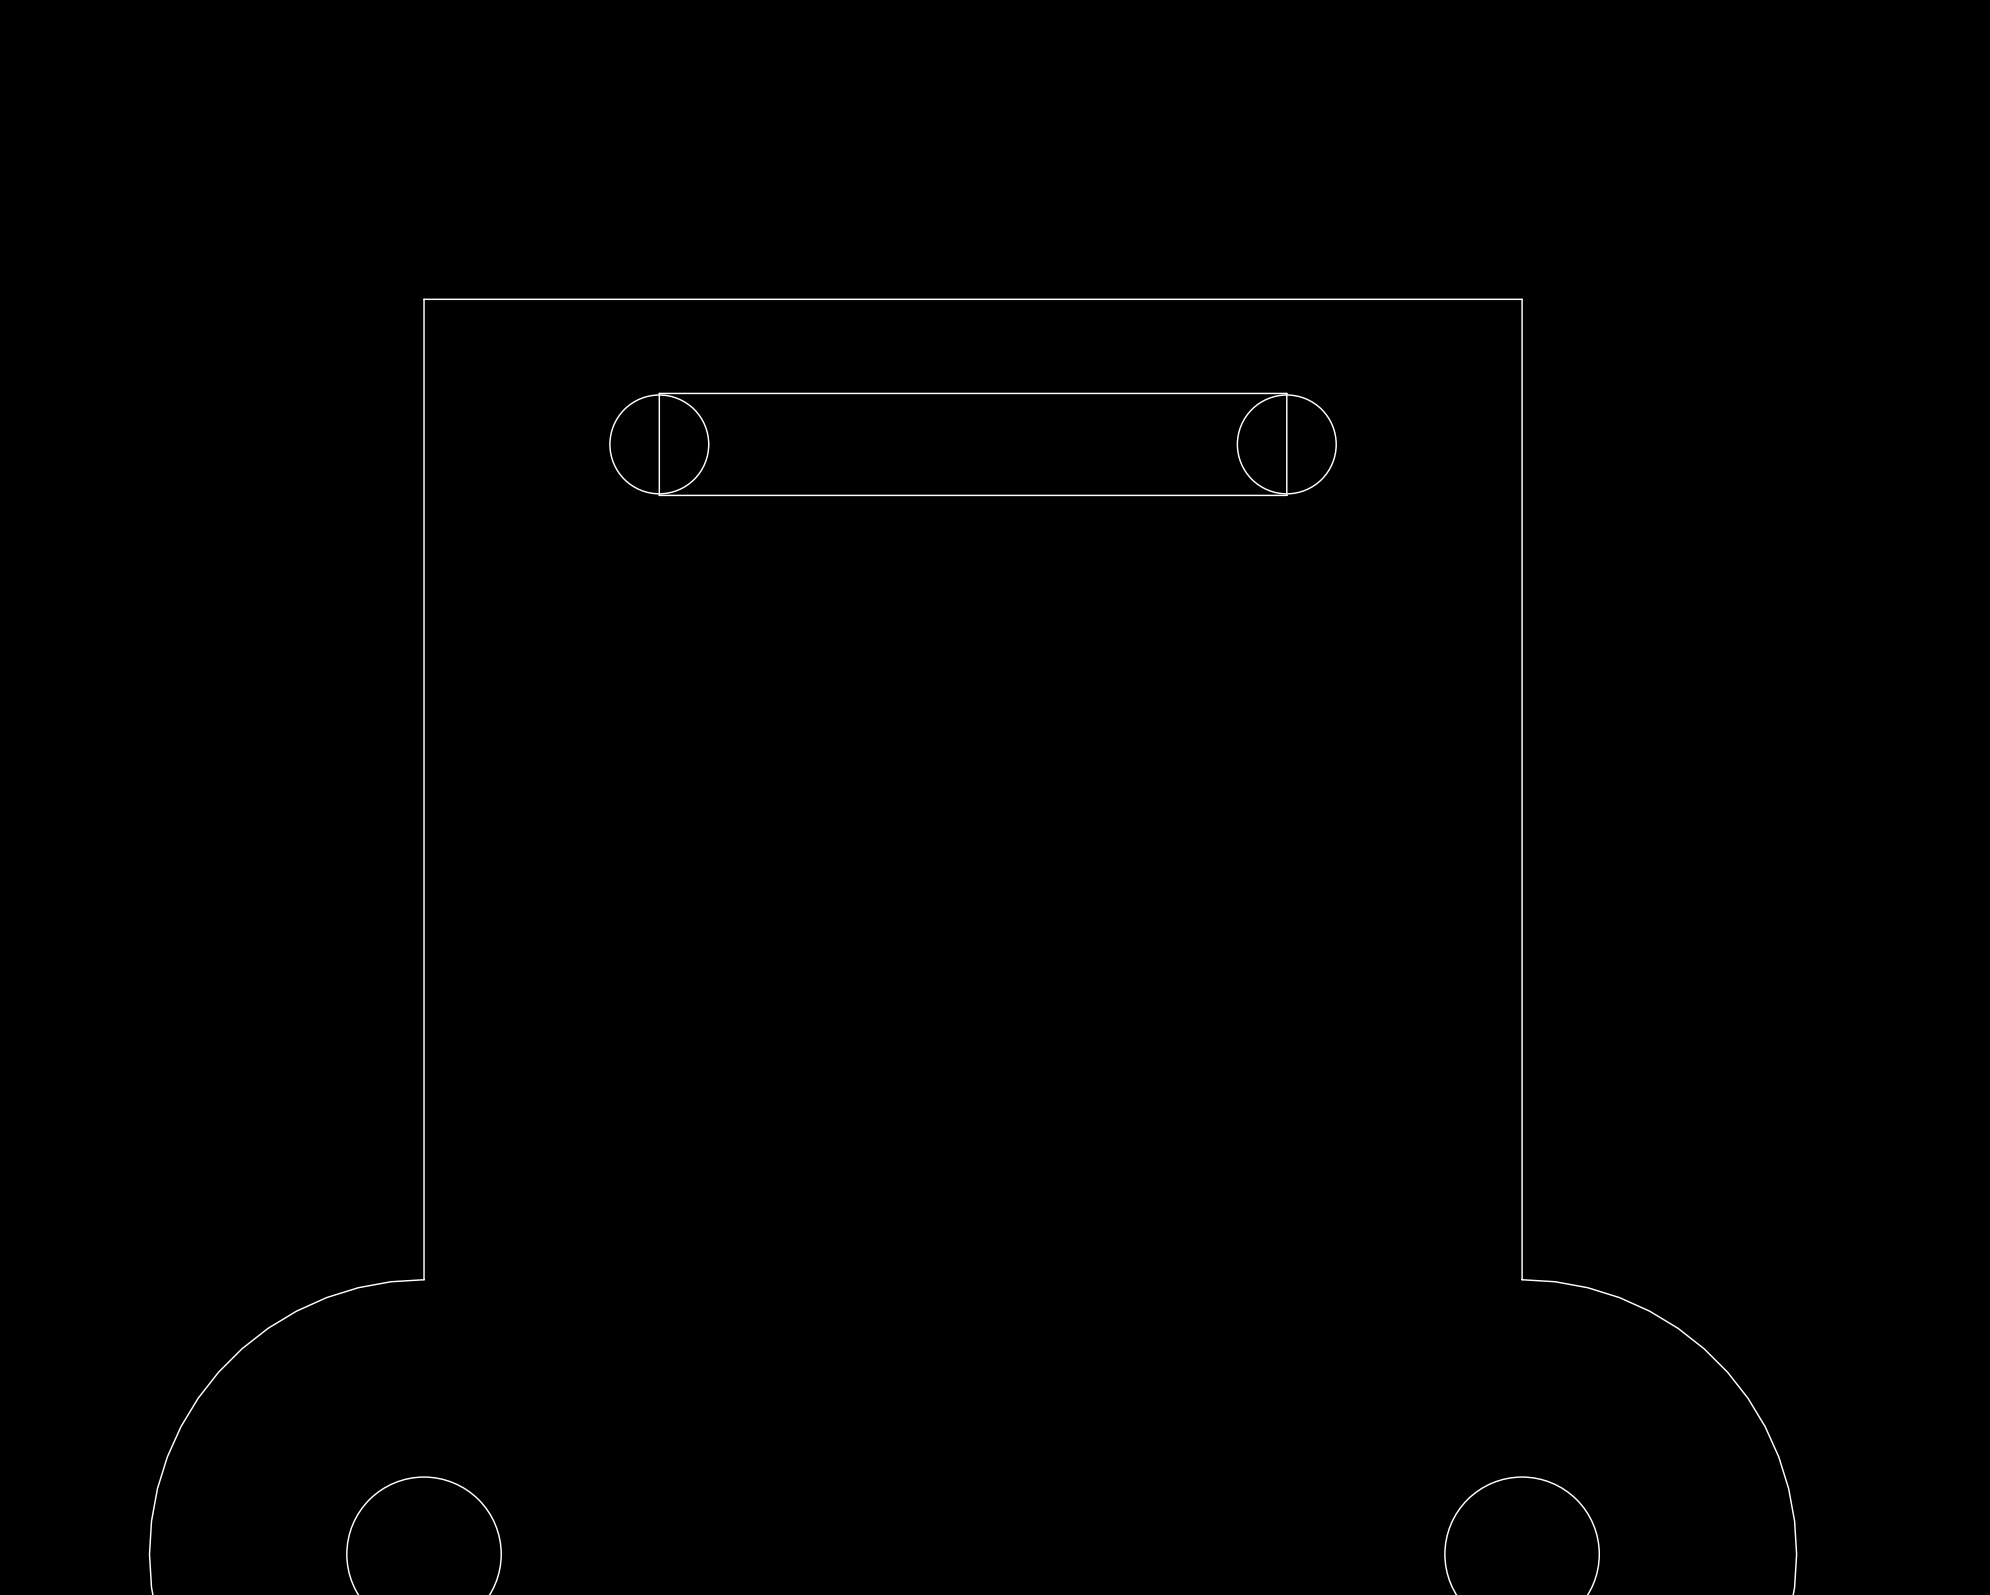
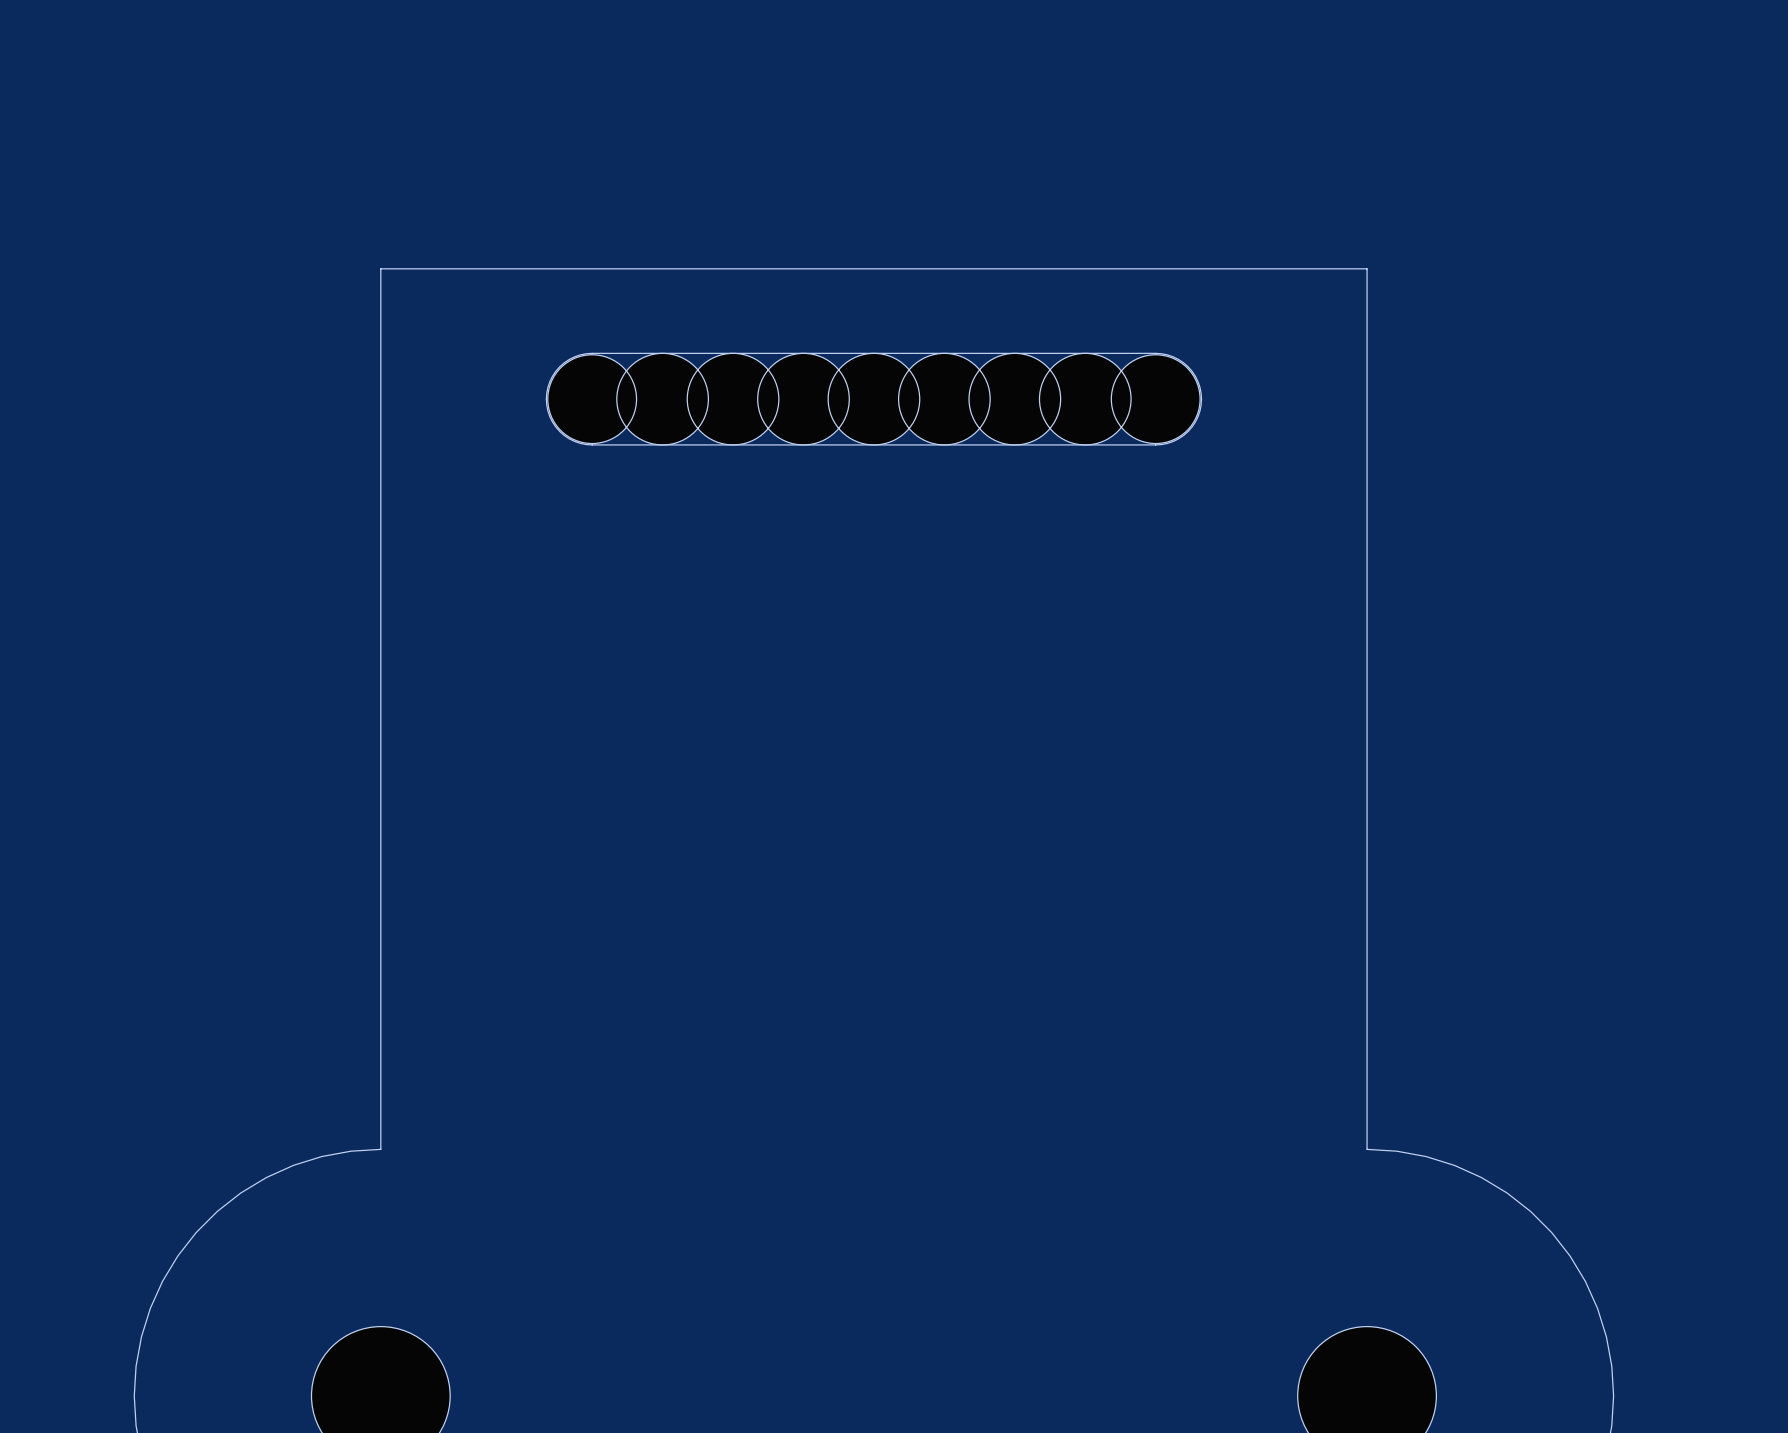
board edge: (659, 393) (659, 495) -> (592, 353) (574, 356) (559, 366) (549, 381) (546, 399) (549, 416) (559, 431) (574, 441) (592, 444)
board edge: (1286, 393) (1286, 495) -> (1155, 353) (1173, 356) (1188, 366) (1198, 381) (1201, 399) (1198, 416) (1188, 431) (1173, 441) (1155, 444)
hole: none -> (662, 399)
hole: none -> (733, 399)
hole: none -> (803, 399)
hole: none -> (873, 399)
hole: none -> (944, 399)
hole: none -> (1014, 399)
hole: none -> (1085, 399)

